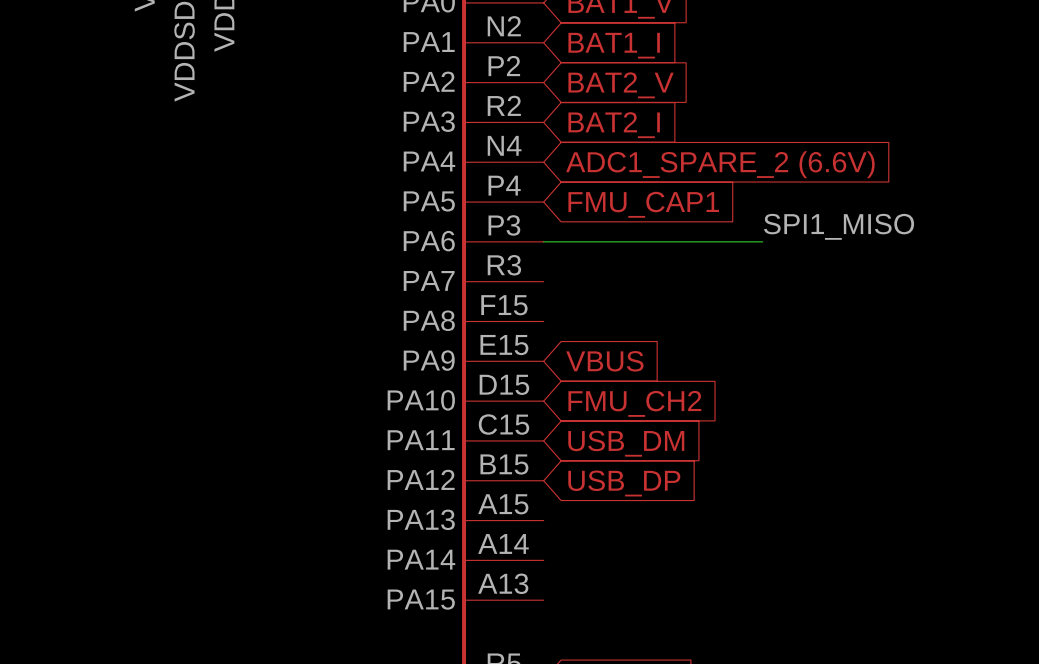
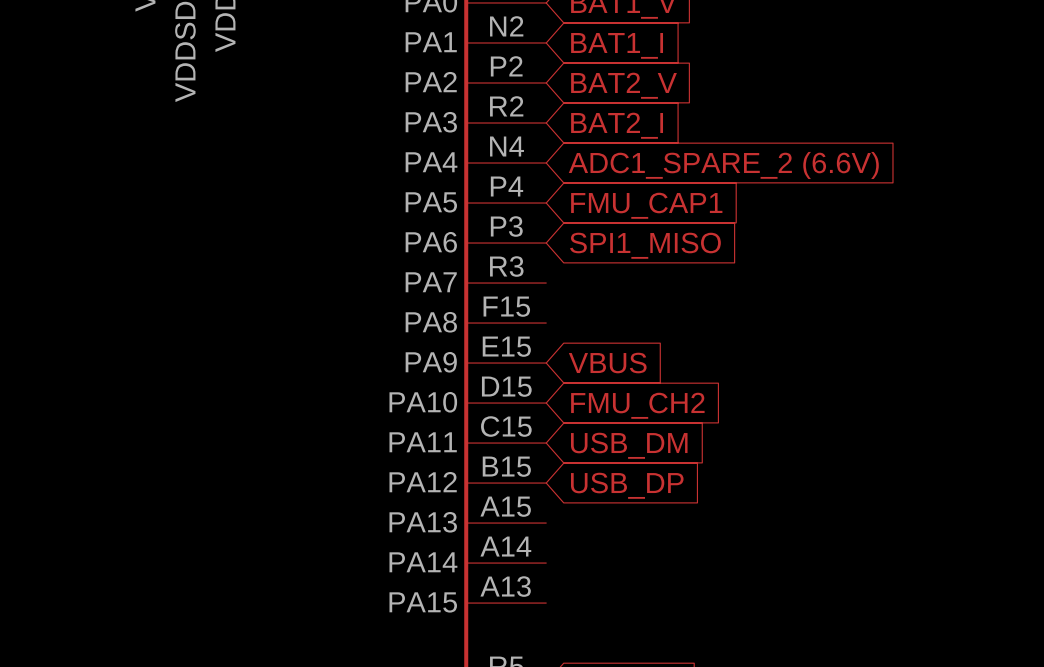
label: SPI1_MISO (839, 226) -> none
wire: (543, 241) (762, 241) -> none
global label: none -> SPI1_MISO (645, 245)

